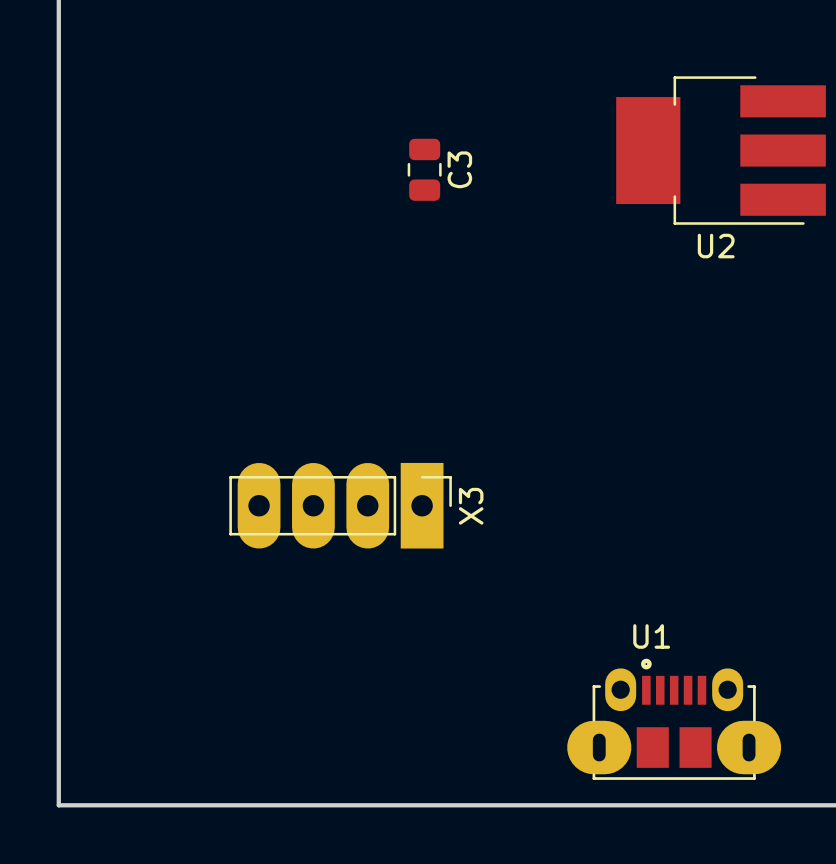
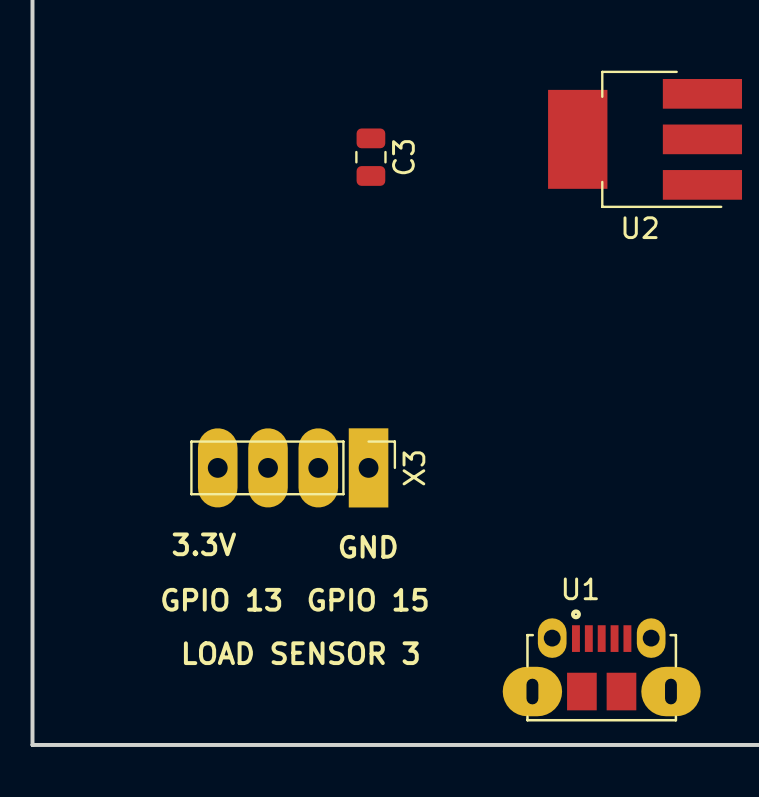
text: none -> 3.3V (204, 544)
text: none -> GND (368, 546)
text: none -> GPIO 13 (221, 599)
text: none -> GPIO 15 (368, 599)
text: none -> LOAD SENSOR 3 (301, 653)

